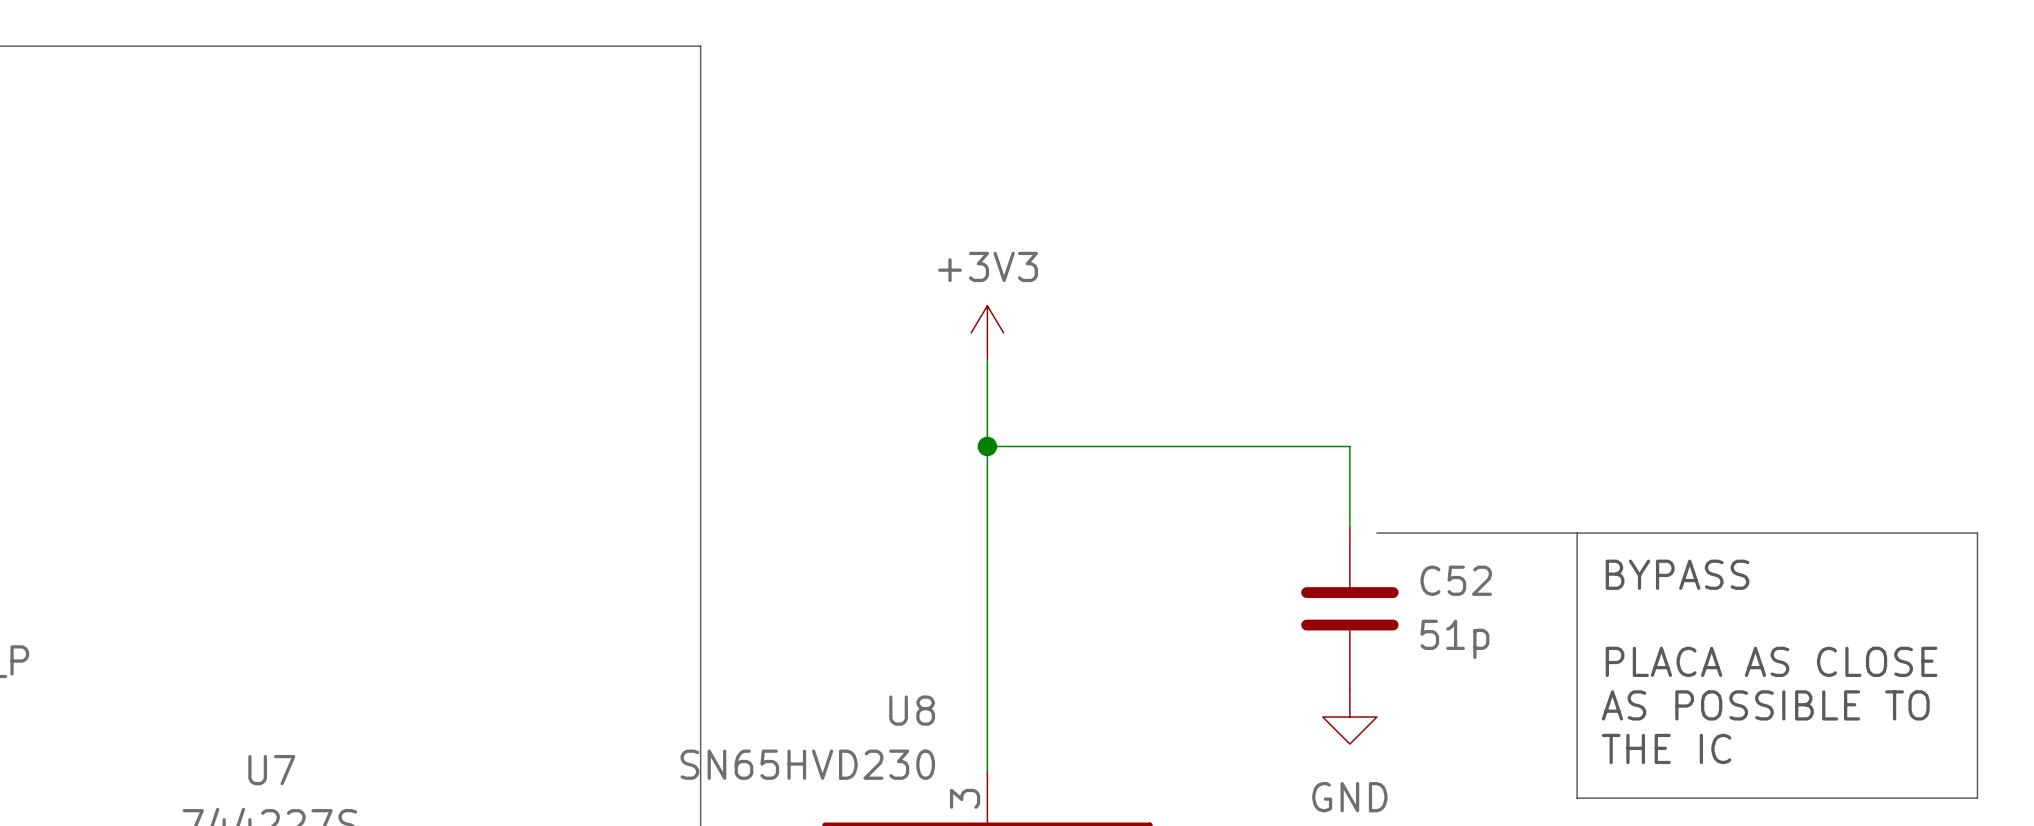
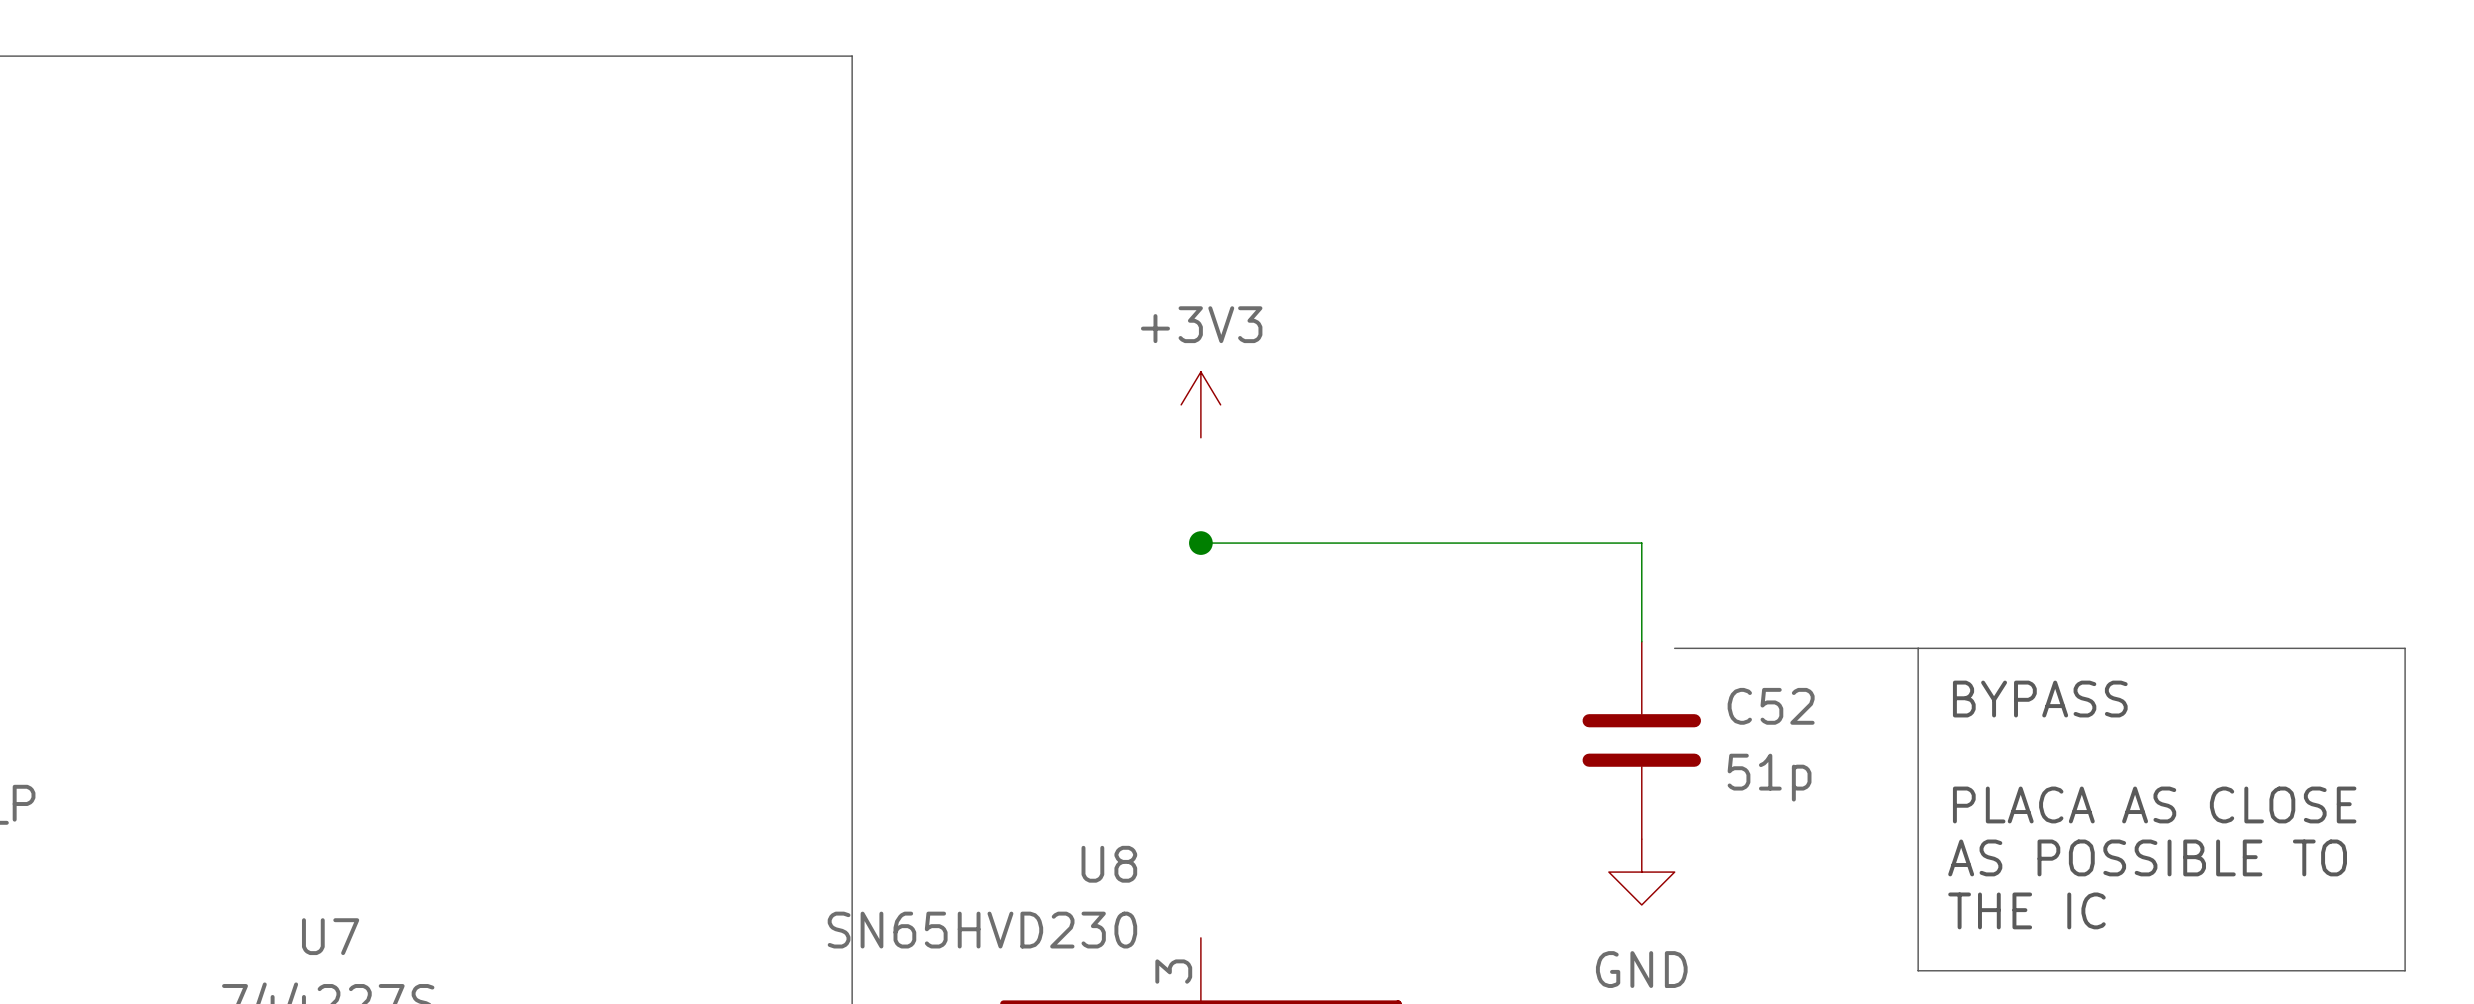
wire: (987, 359) (987, 771) -> none

